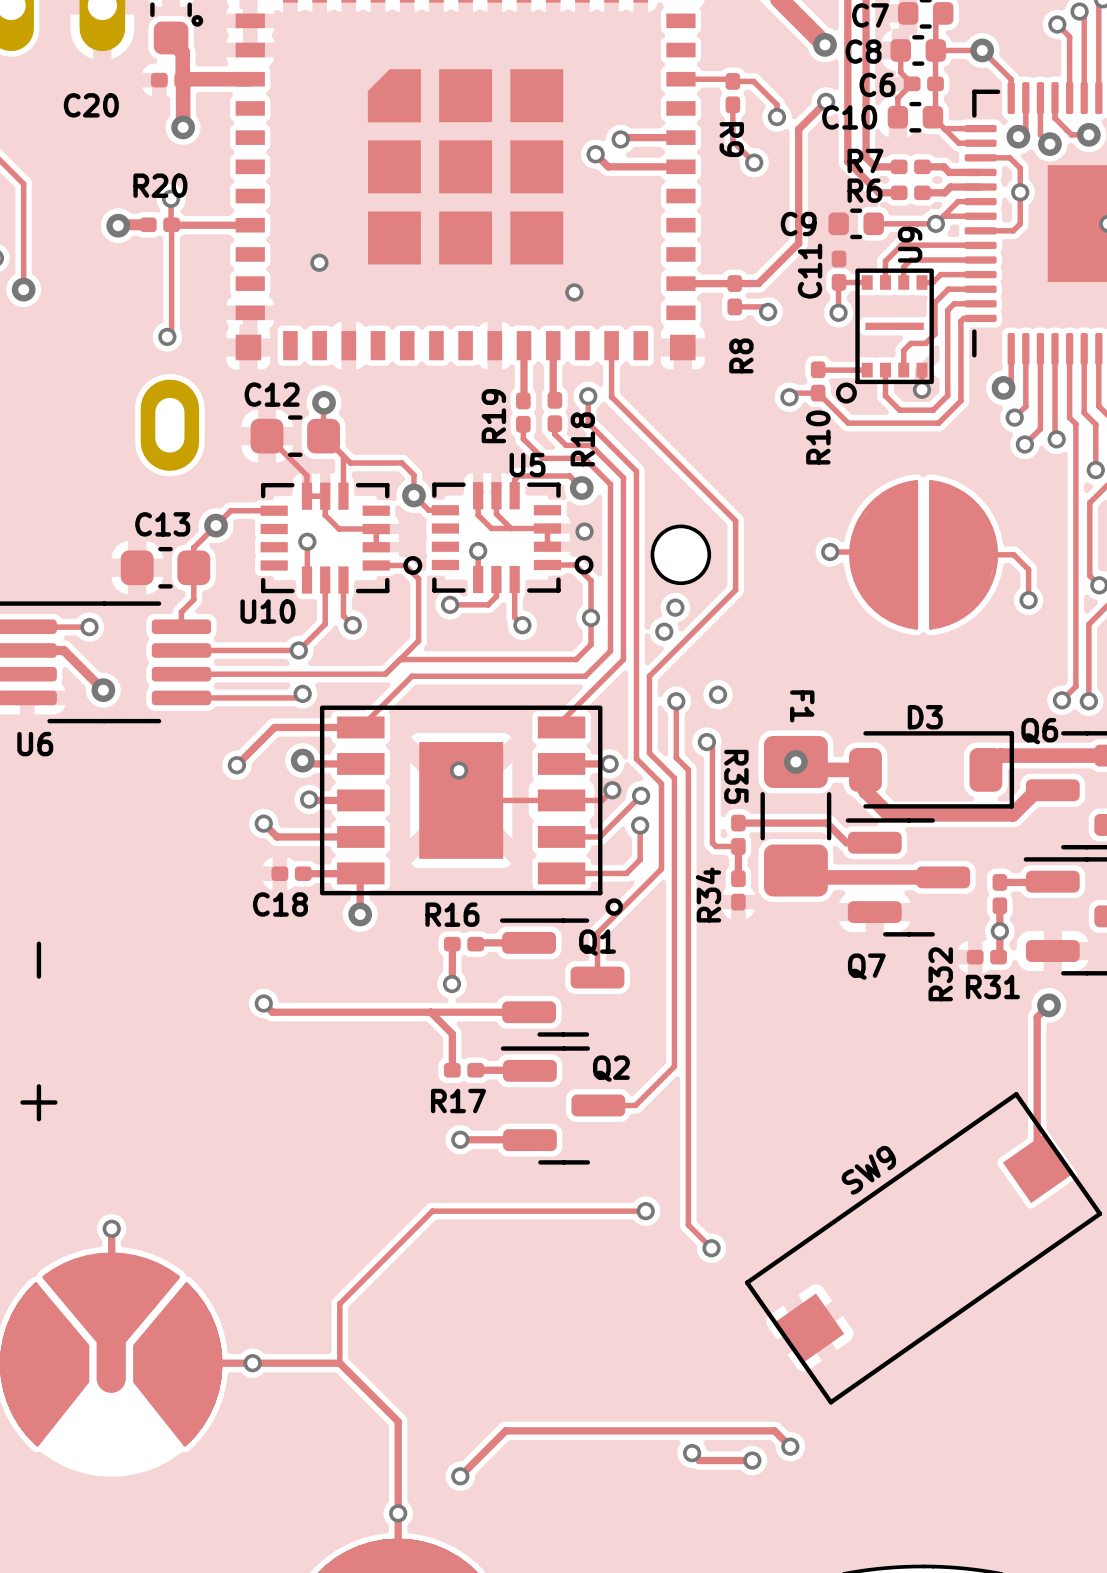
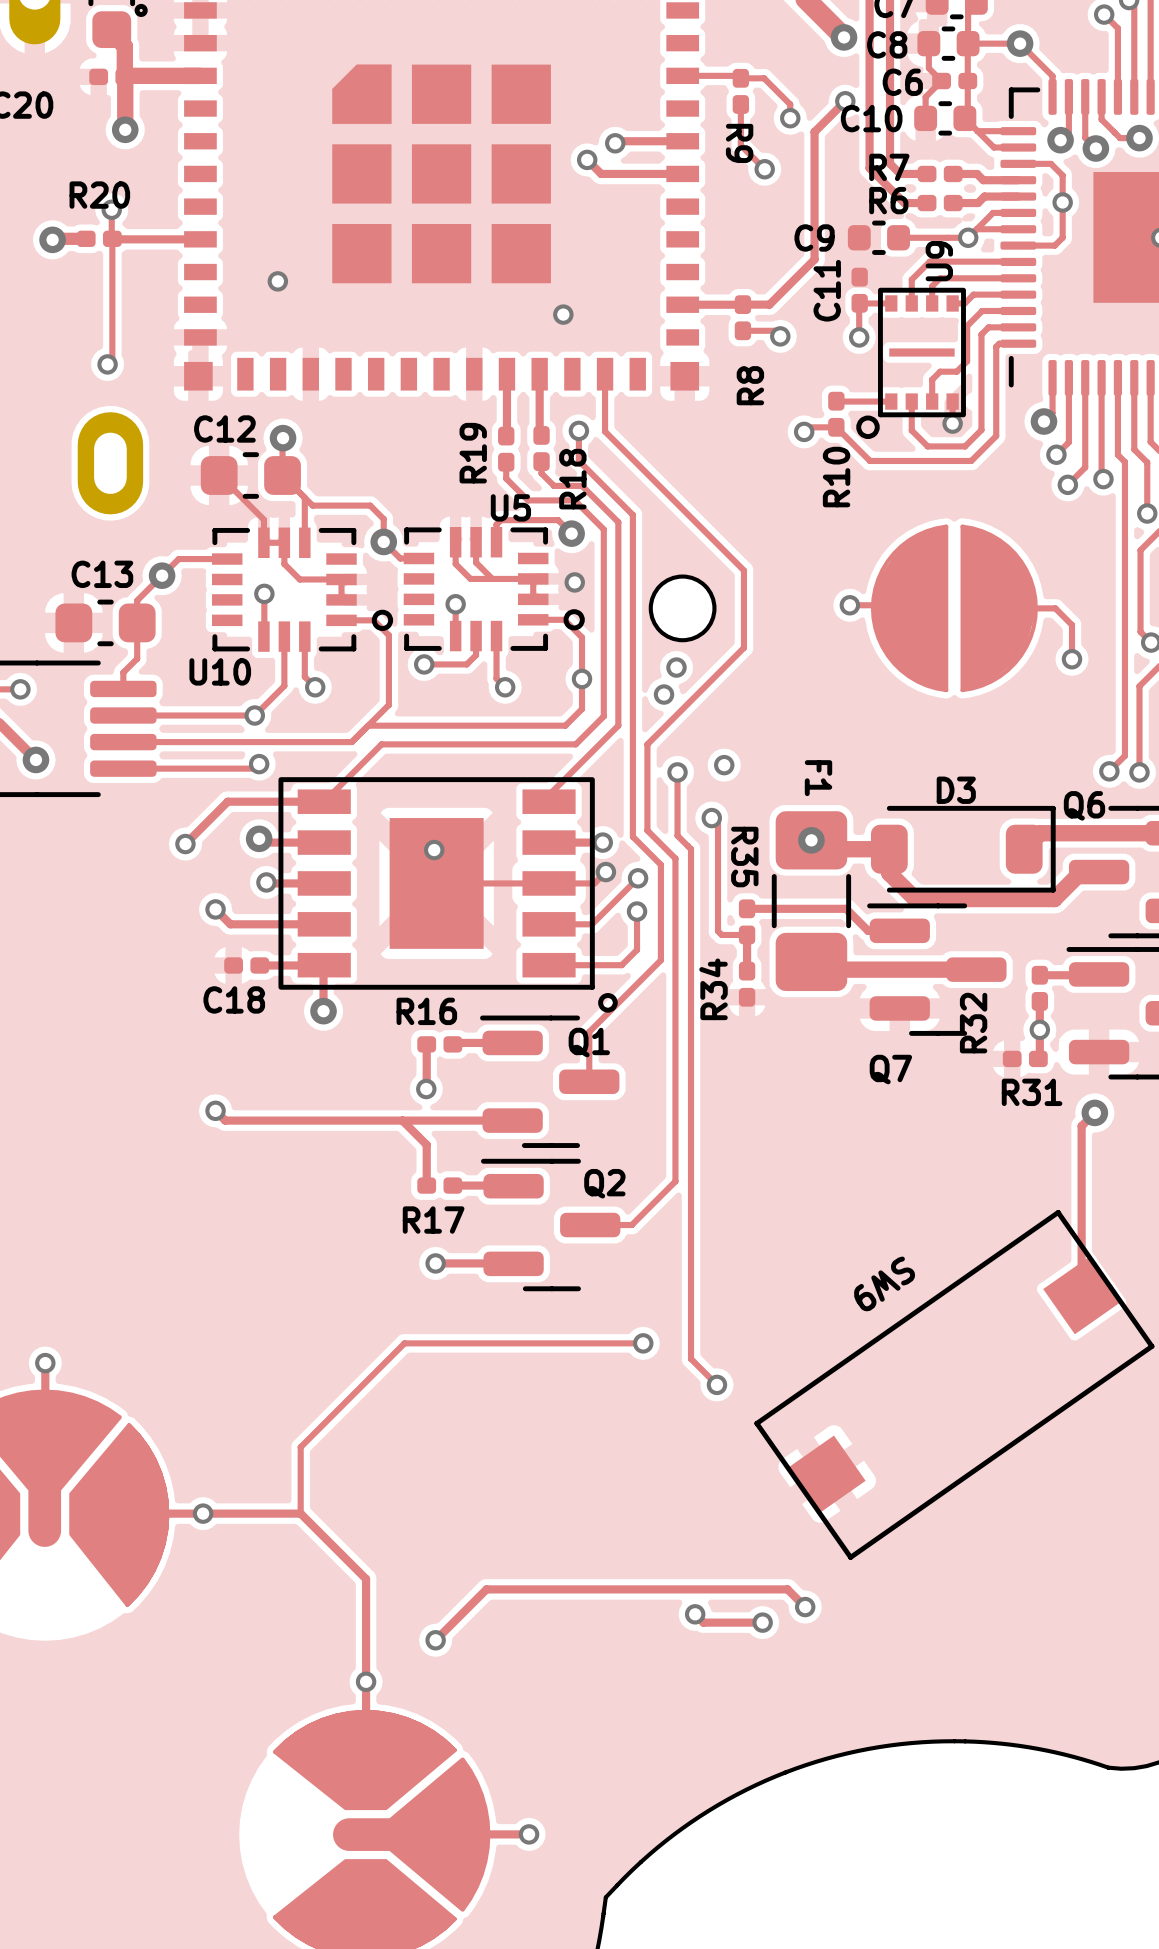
R32 name position: R32 (940, 974) -> R32 (973, 1023)
SW9 name rotation: 0° (868, 1170) -> 180° (884, 1283)

